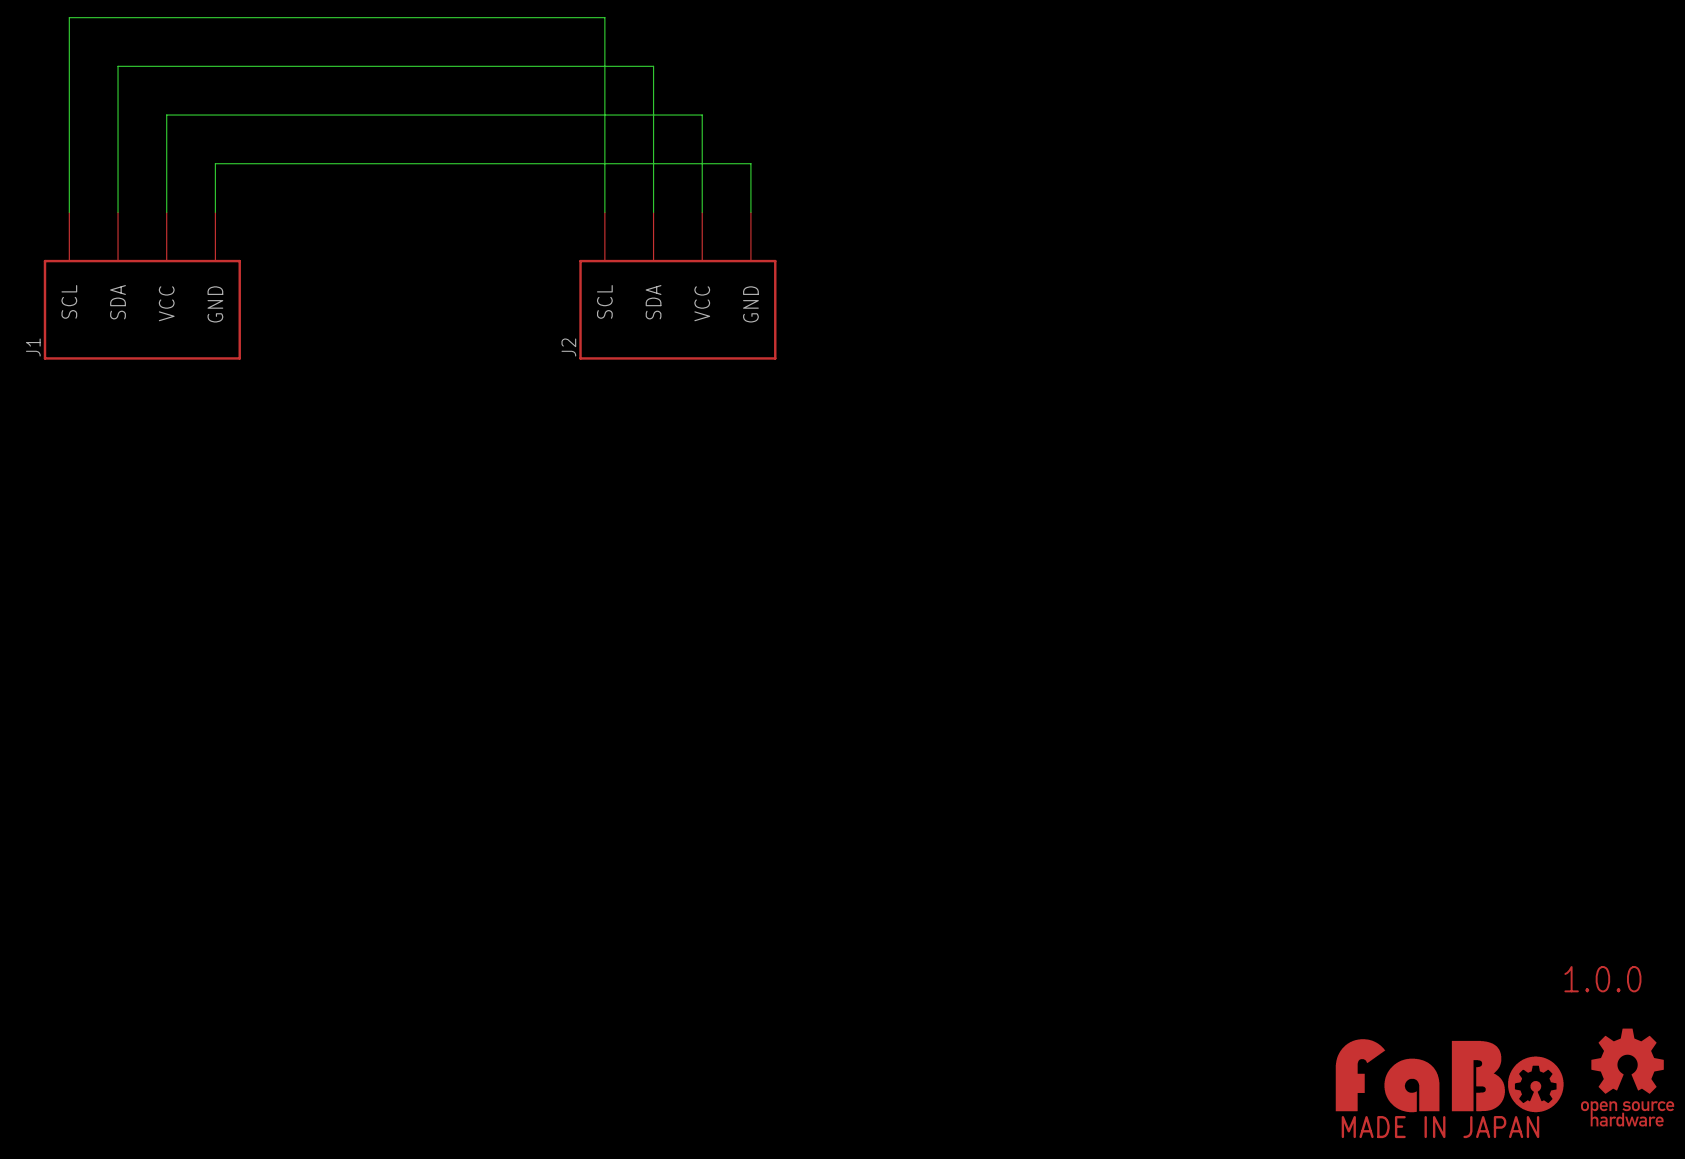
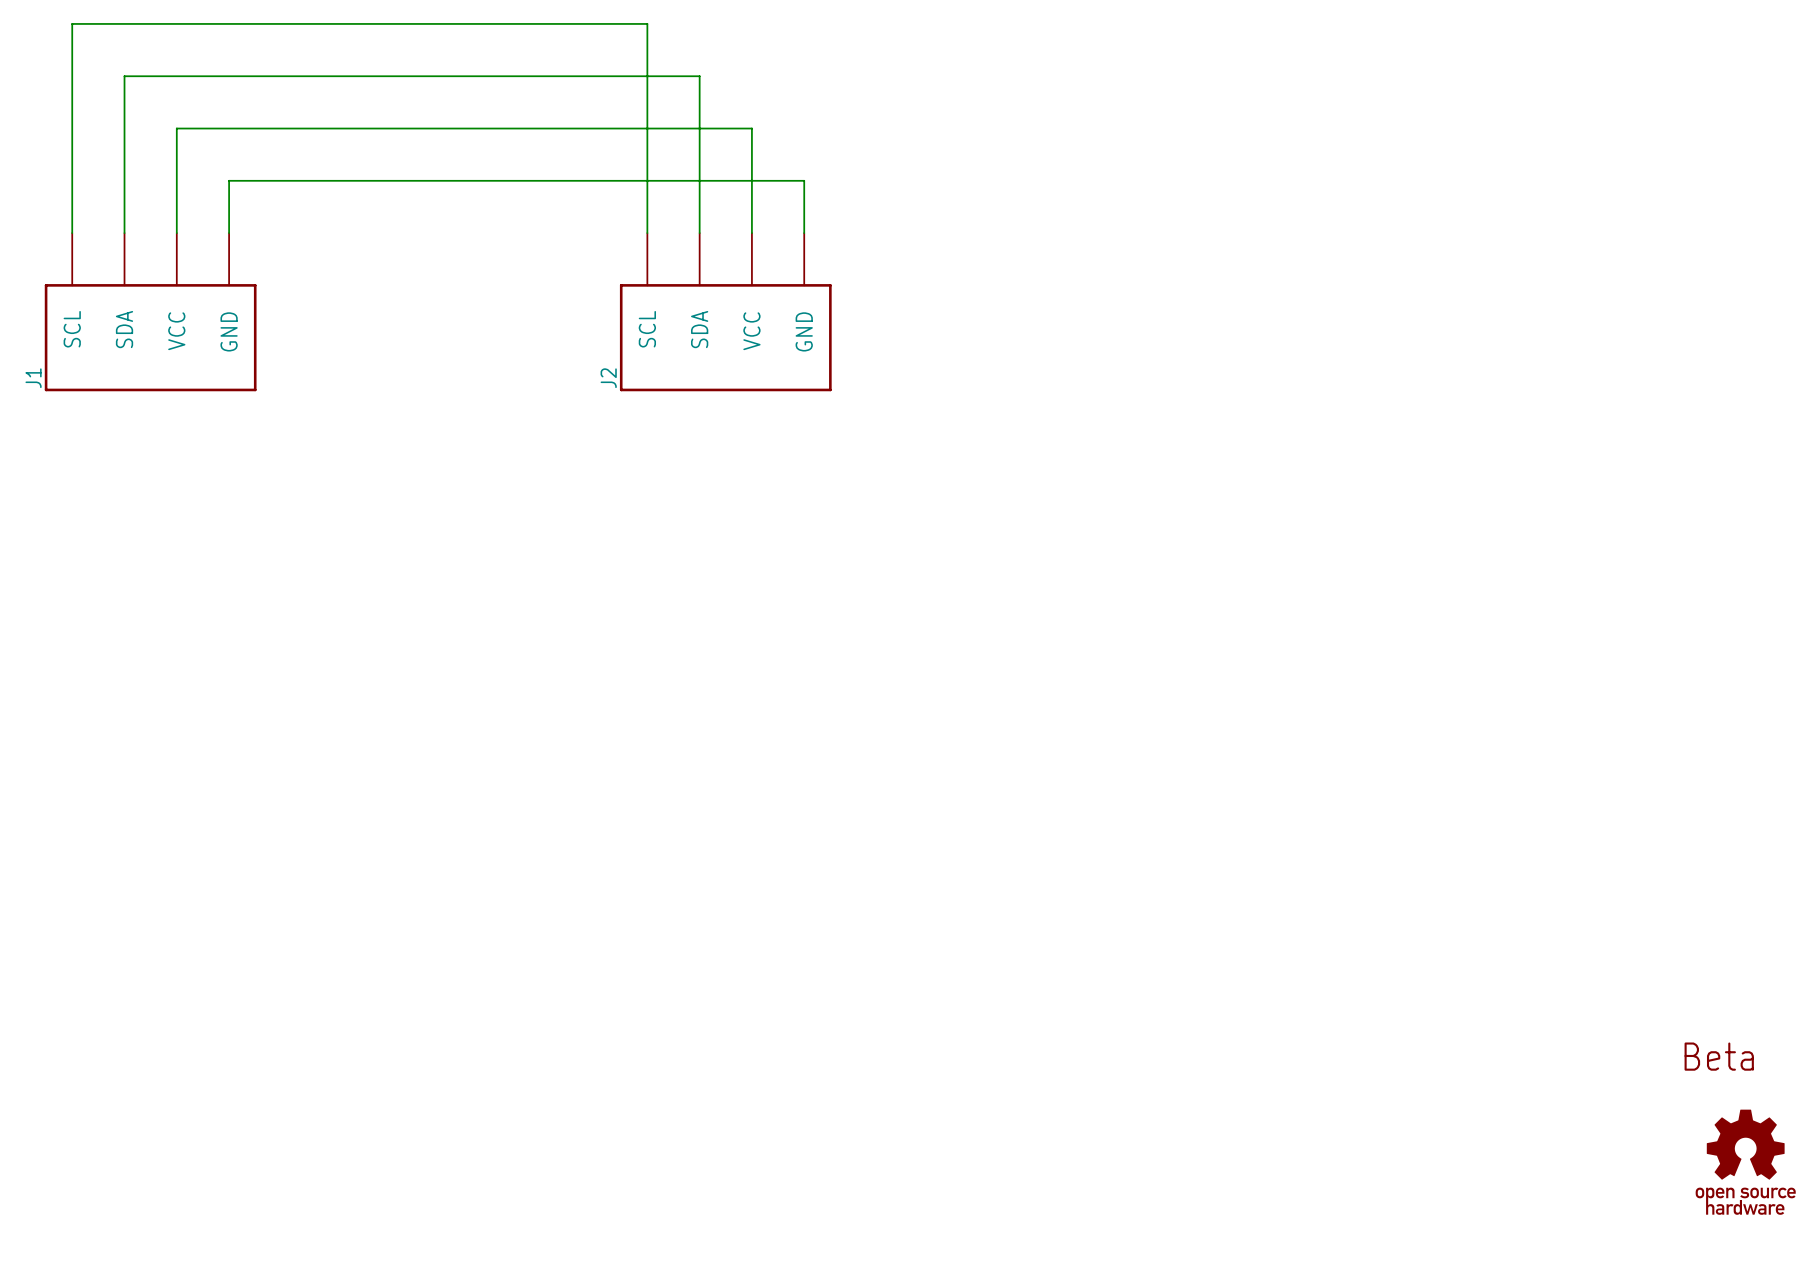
text: 1.0.0 (1602, 979) -> Beta (1719, 1056)
part: (1449, 1075) -> none

